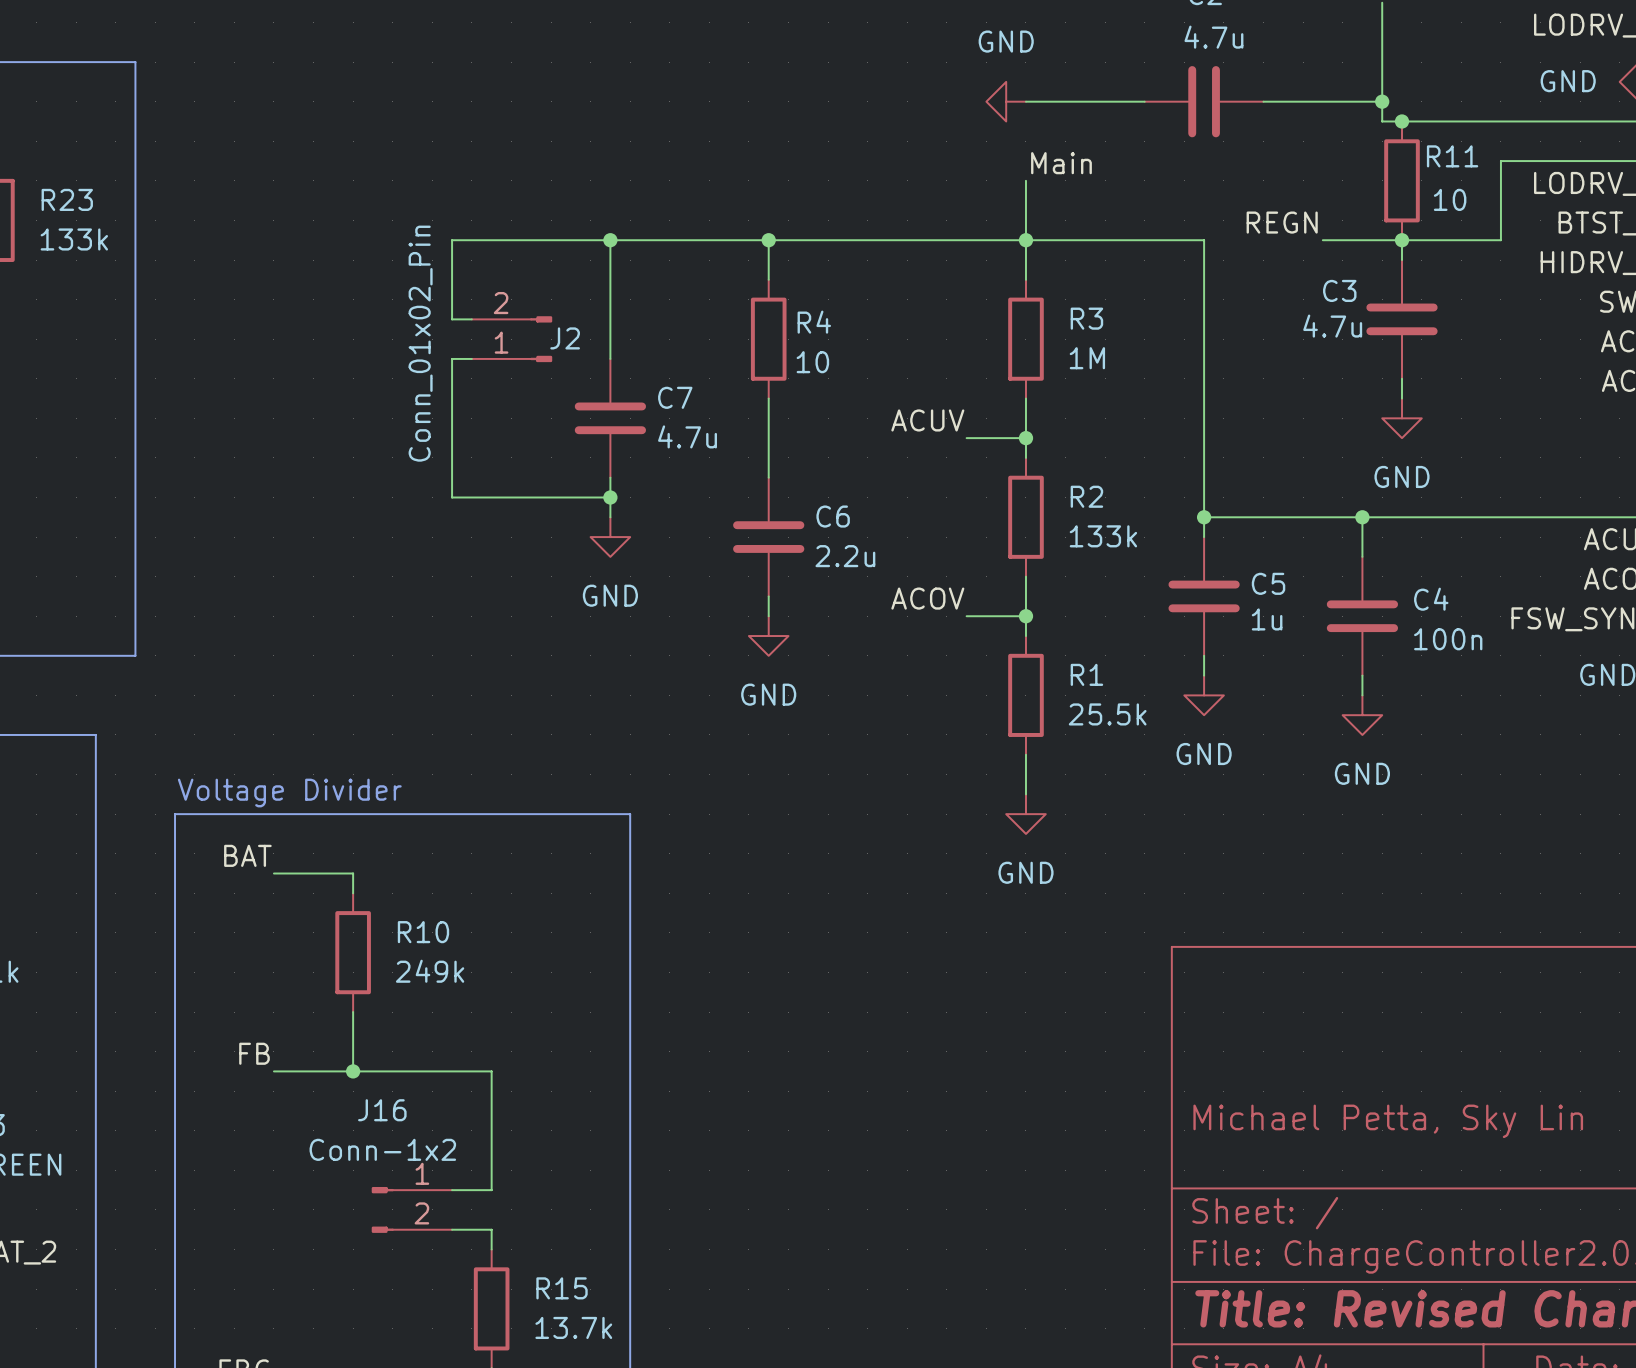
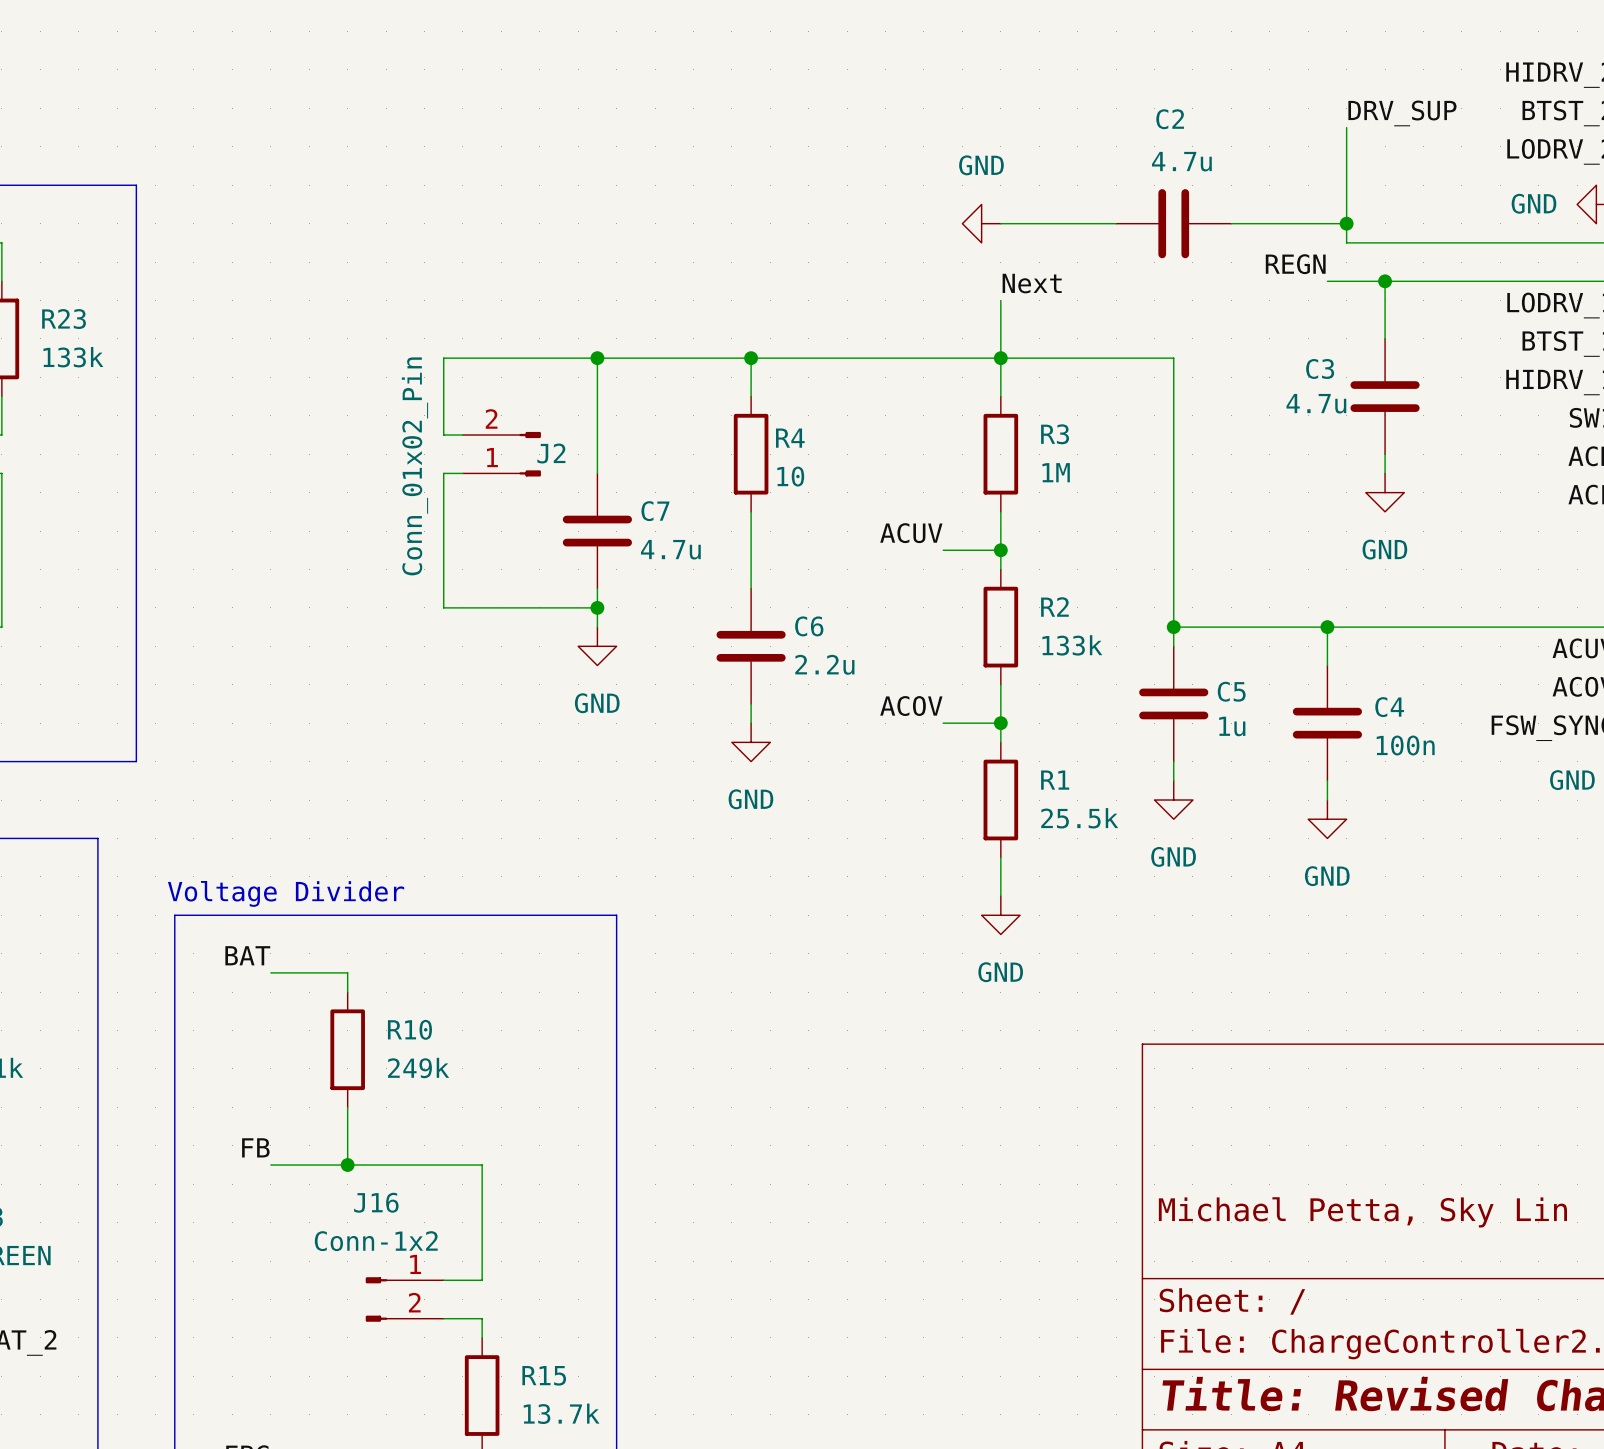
junction: (1402, 121) -> none
wire: none -> (1385, 281) (1385, 338)
junction: none -> (1385, 281)
wire: (1500, 161) (1500, 240) (1322, 240) -> (1461, 281) (1327, 281)
label: Main (1061, 163) -> Next (1032, 283)
R11: 10 (1402, 180) -> none
label position: REGN (1282, 222) -> REGN (1295, 264)
wire: (1402, 240) (1402, 260) -> none
junction: (1402, 240) -> none
C3 position: (1402, 319) -> (1385, 396)
wire: (1402, 378) (1402, 398) -> (1385, 454) (1385, 473)
power symbol position: GND (1402, 418) -> GND (1385, 492)

